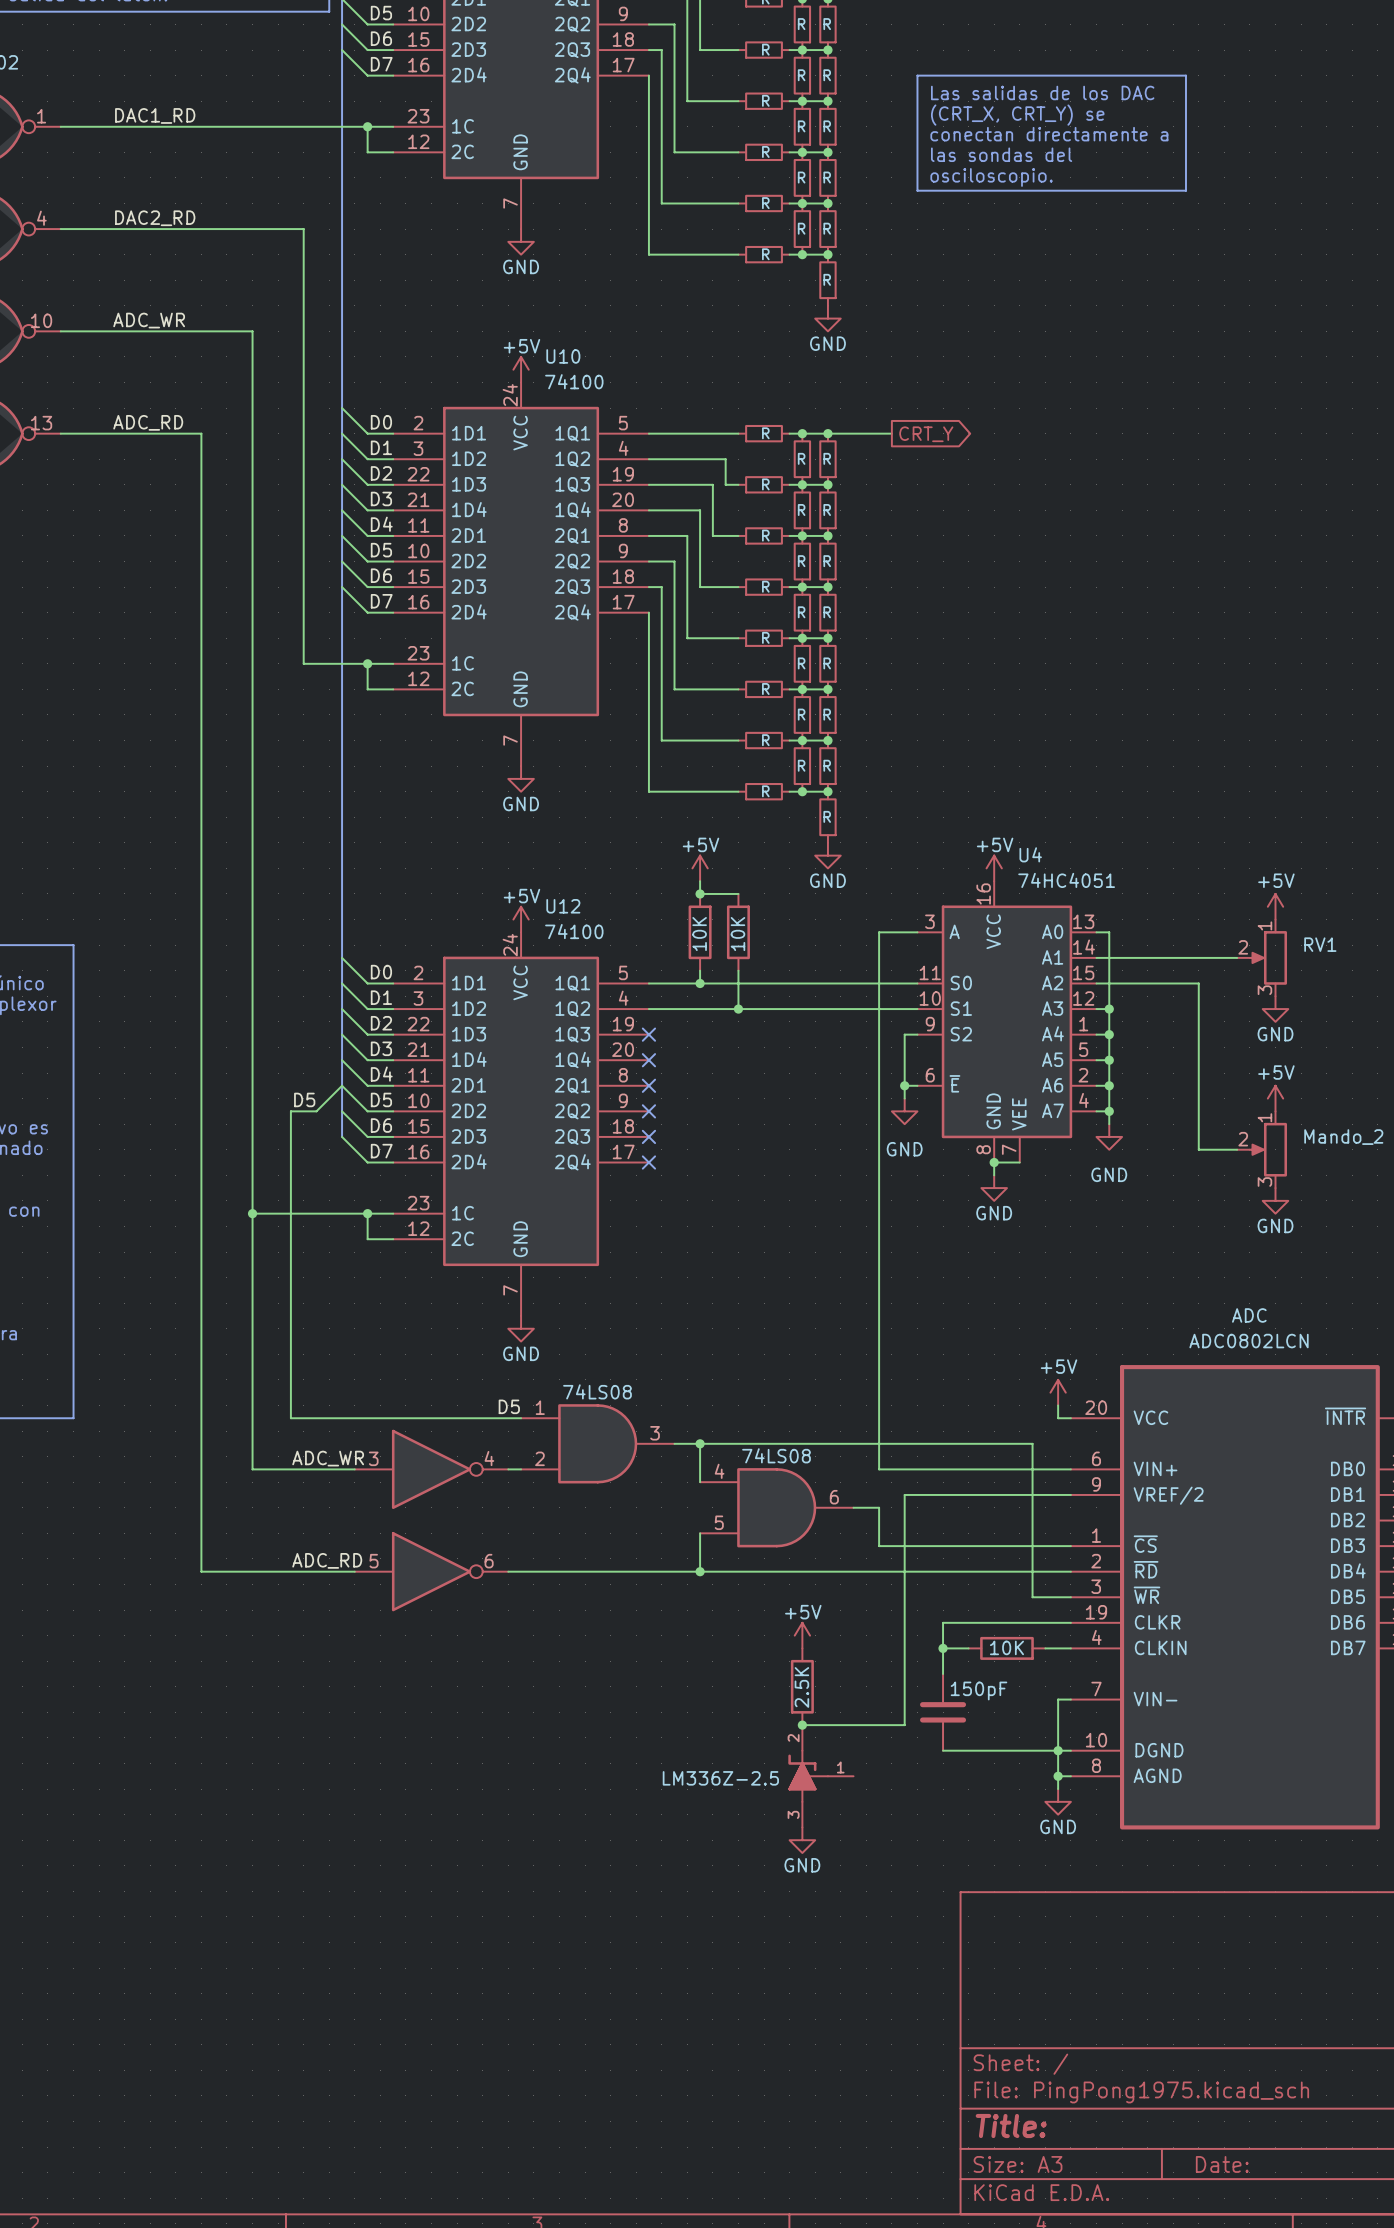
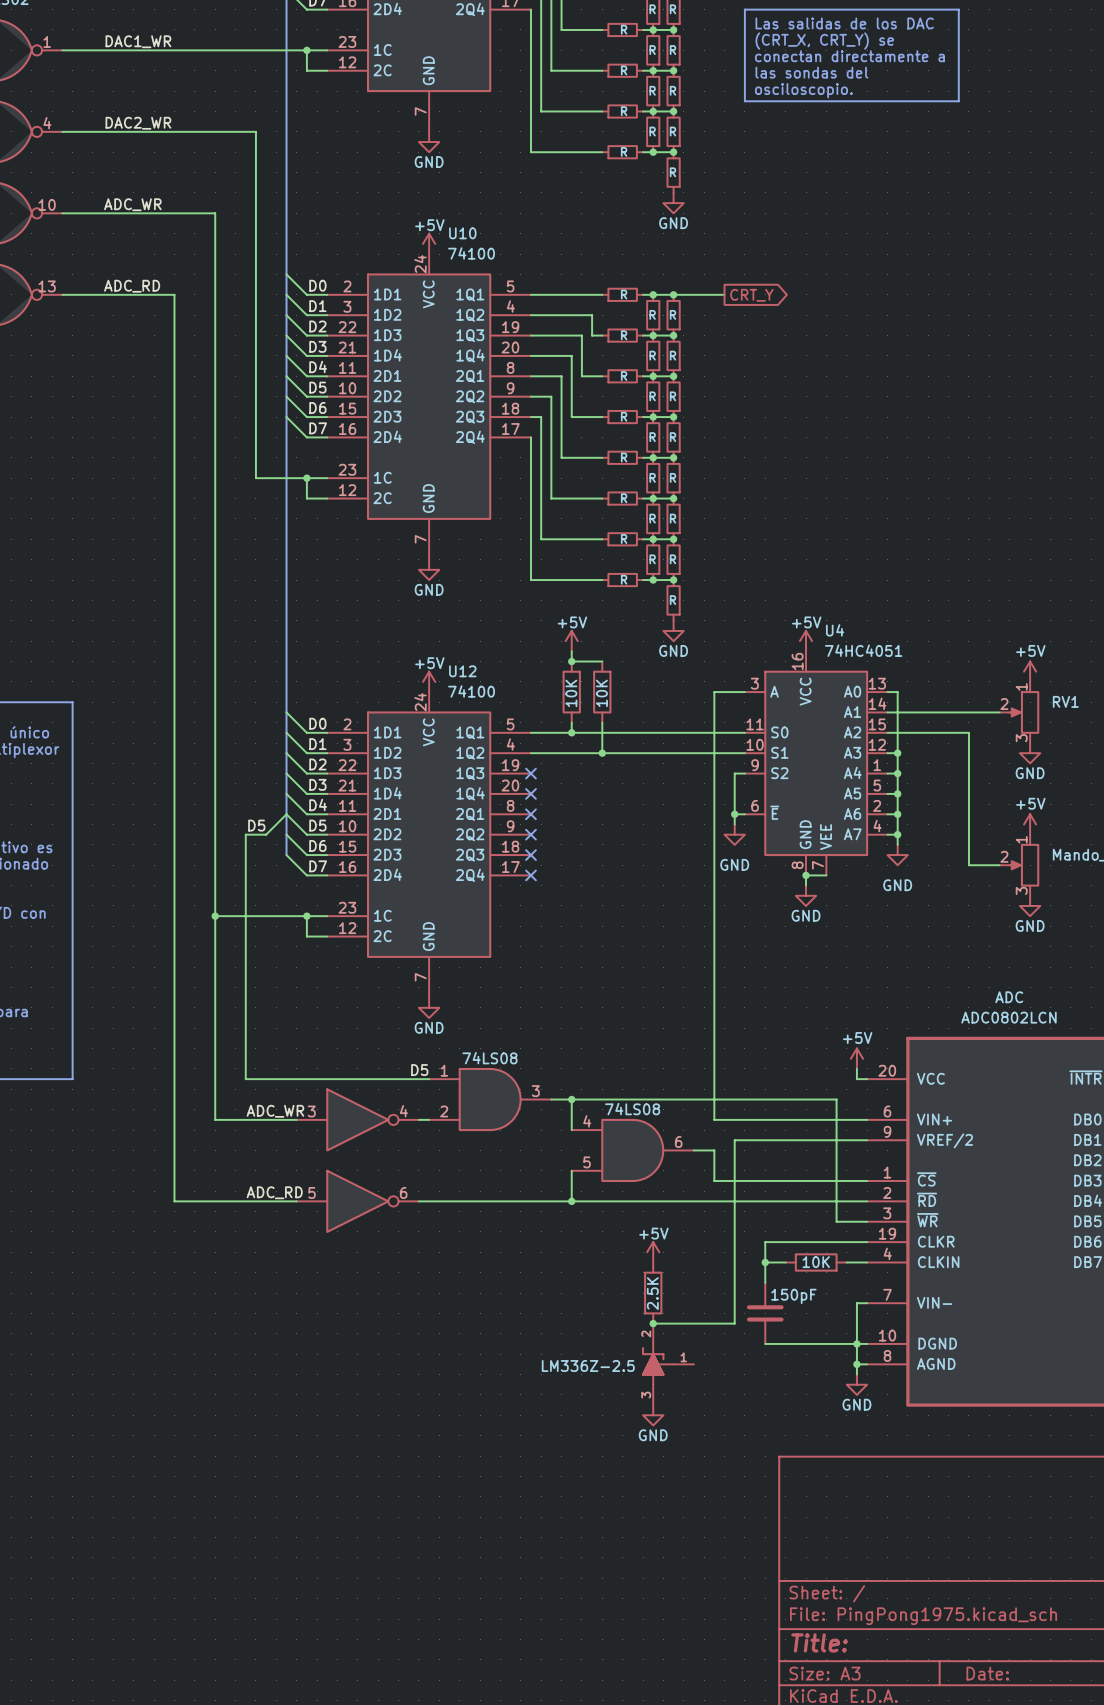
label: DAC1_RD (155, 115) -> DAC1_WR (138, 41)
label: DAC2_RD (155, 218) -> DAC2_WR (138, 123)

